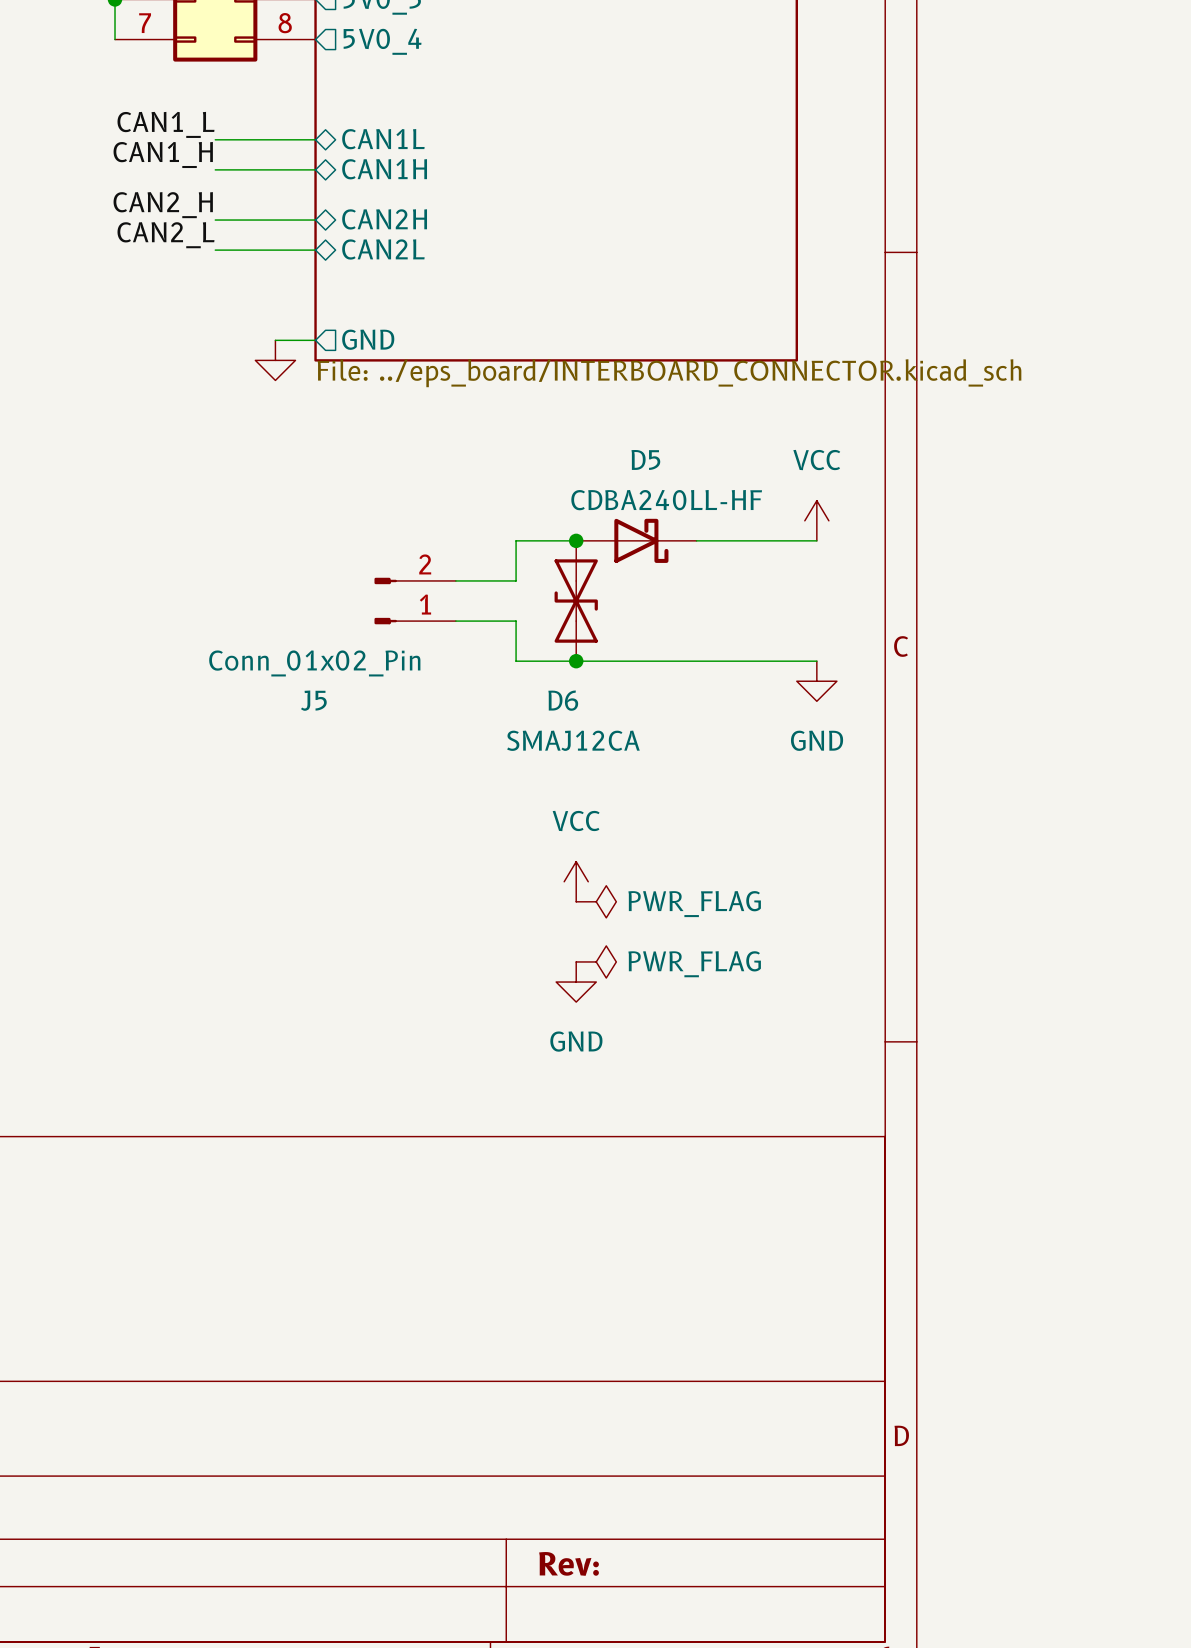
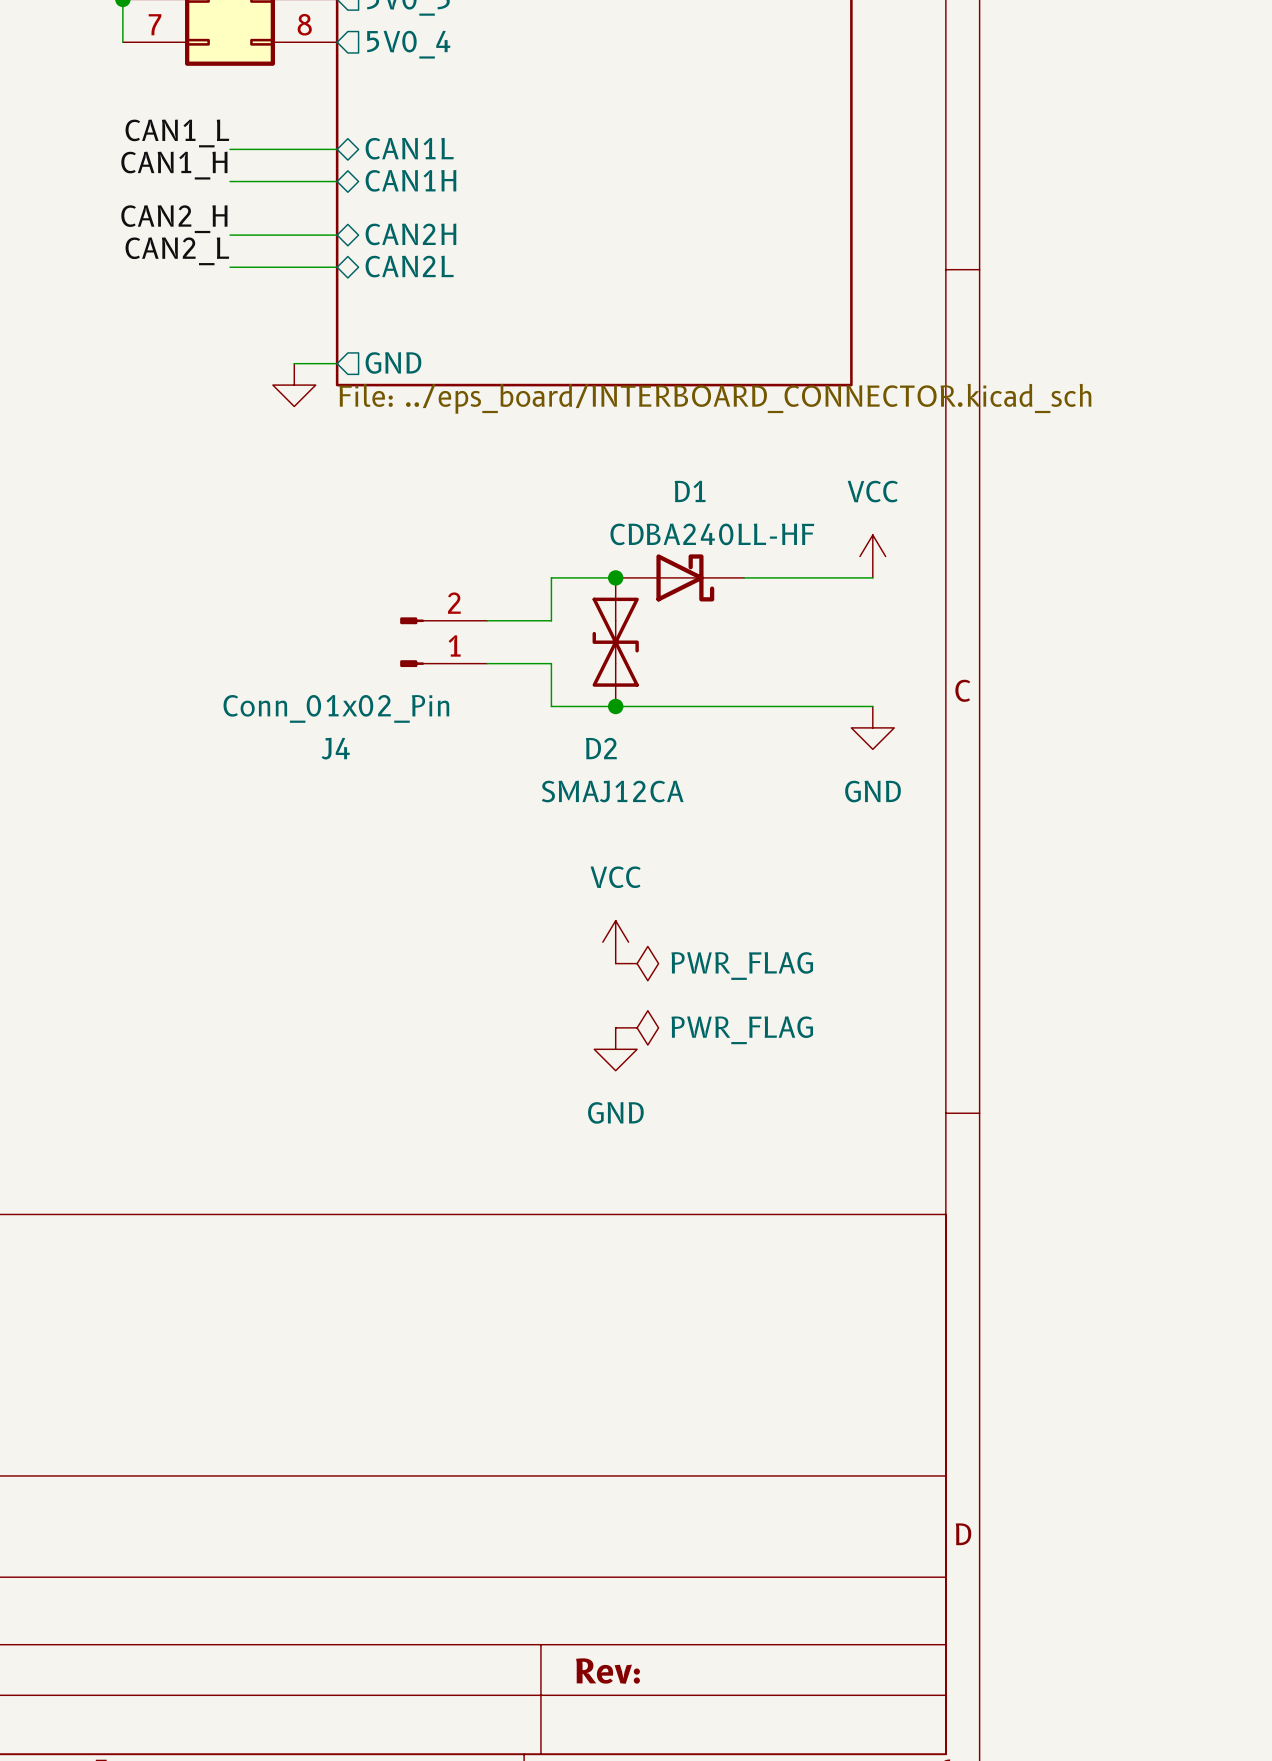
D5 name: D5 (645, 459) -> D1 (690, 491)
J5 name: J5 (313, 700) -> J4 (335, 748)
D6 name: D6 (563, 700) -> D2 (601, 748)

